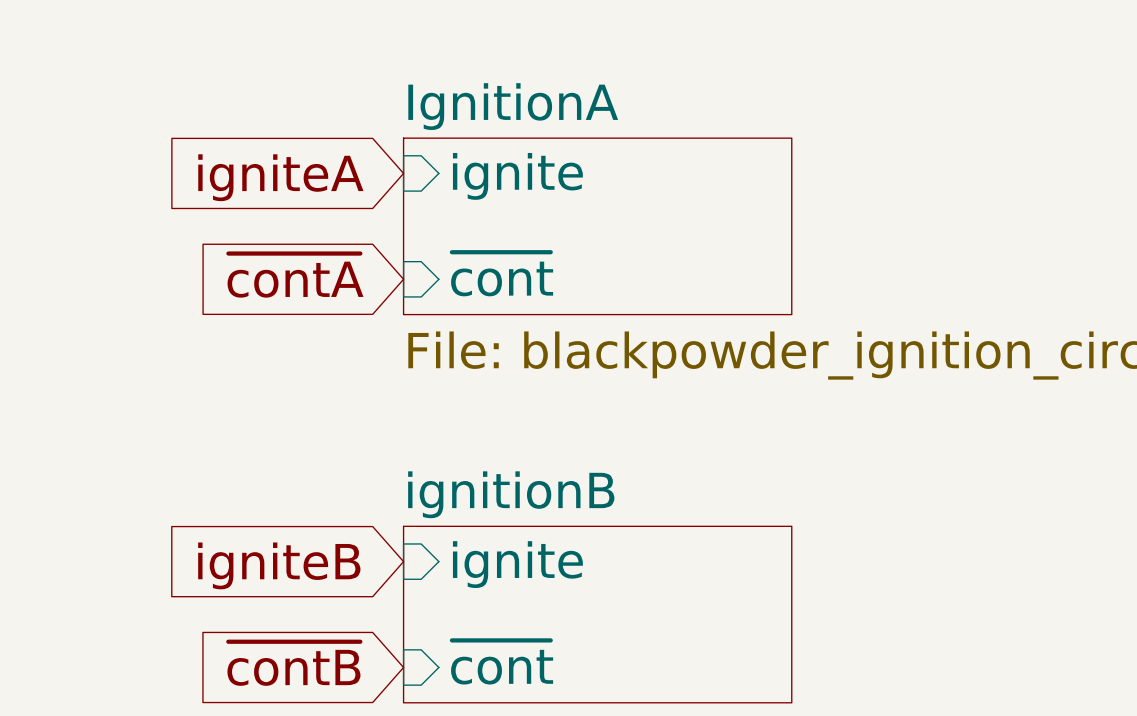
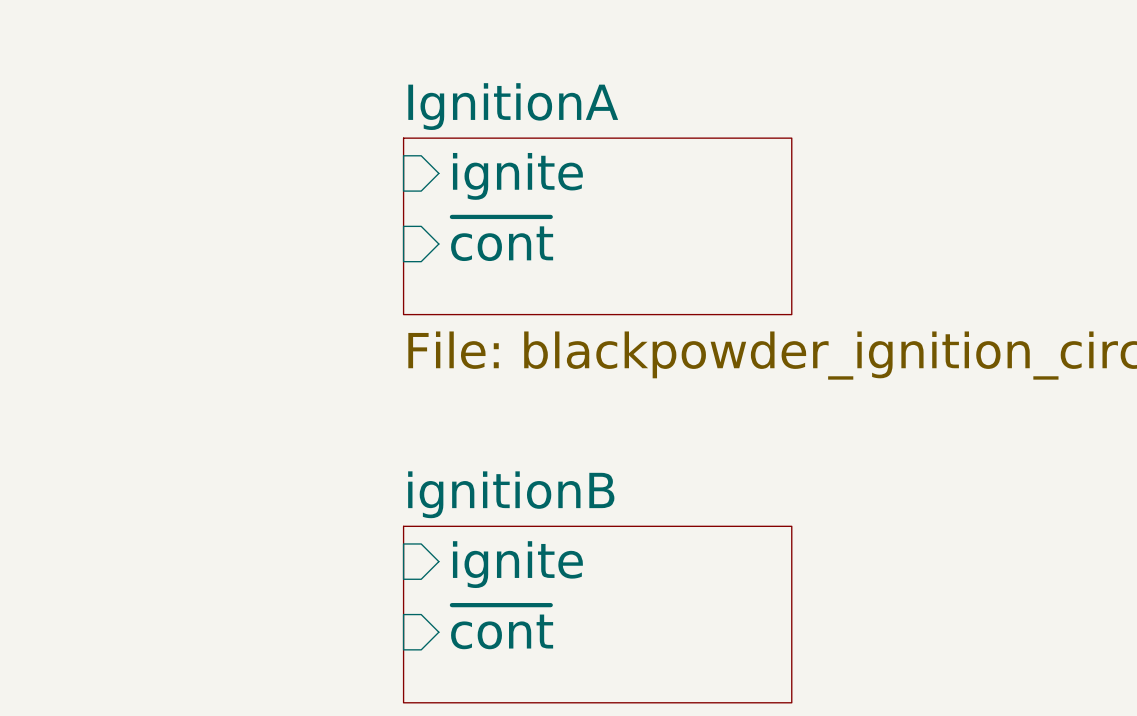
global label: igniteA (280, 177) -> none
sheet pin position: ~{cont} (502, 274) -> ~{cont} (502, 238)
global label: ~{contA} (295, 275) -> none
global label: igniteB (279, 565) -> none
sheet pin position: ~{cont} (502, 662) -> ~{cont} (502, 627)
global label: ~{contB} (293, 663) -> none

